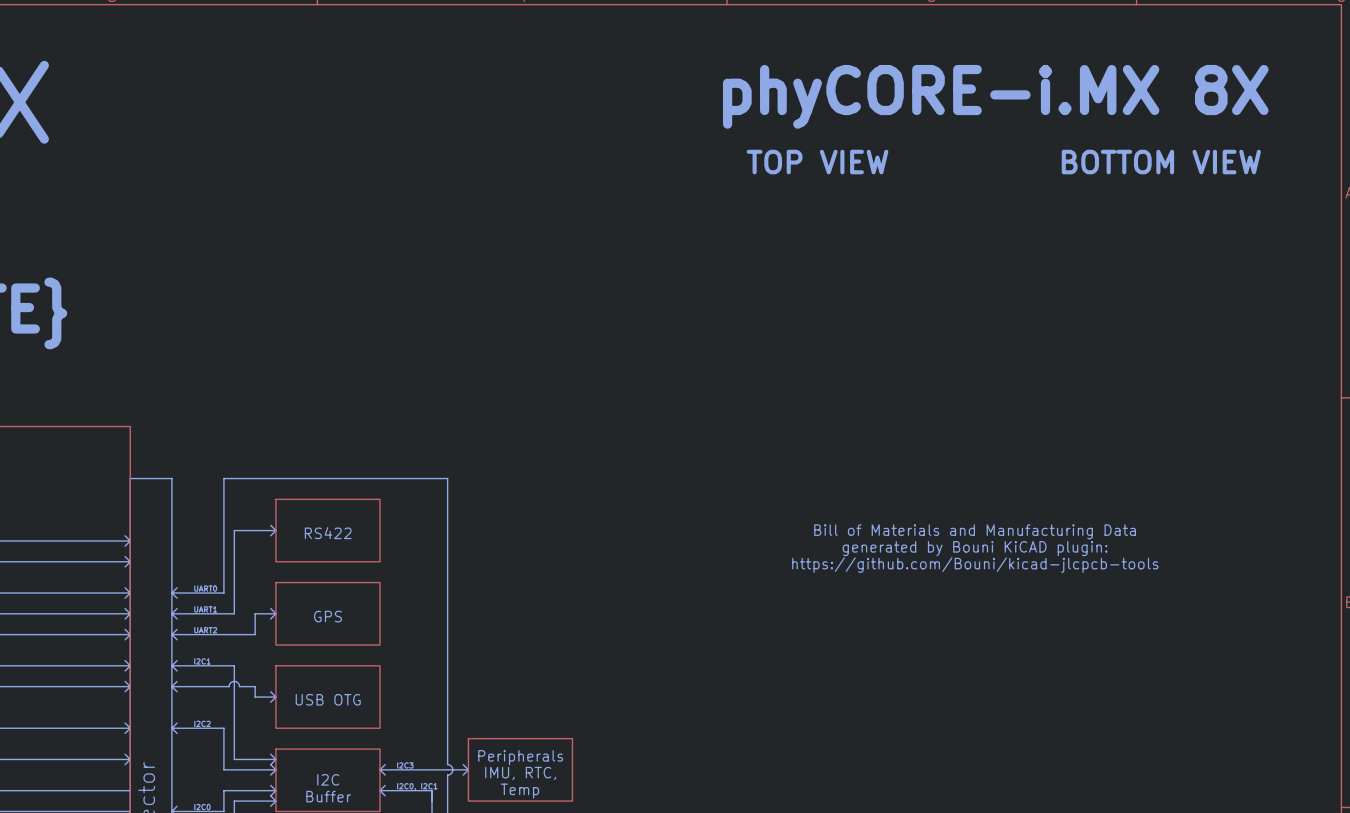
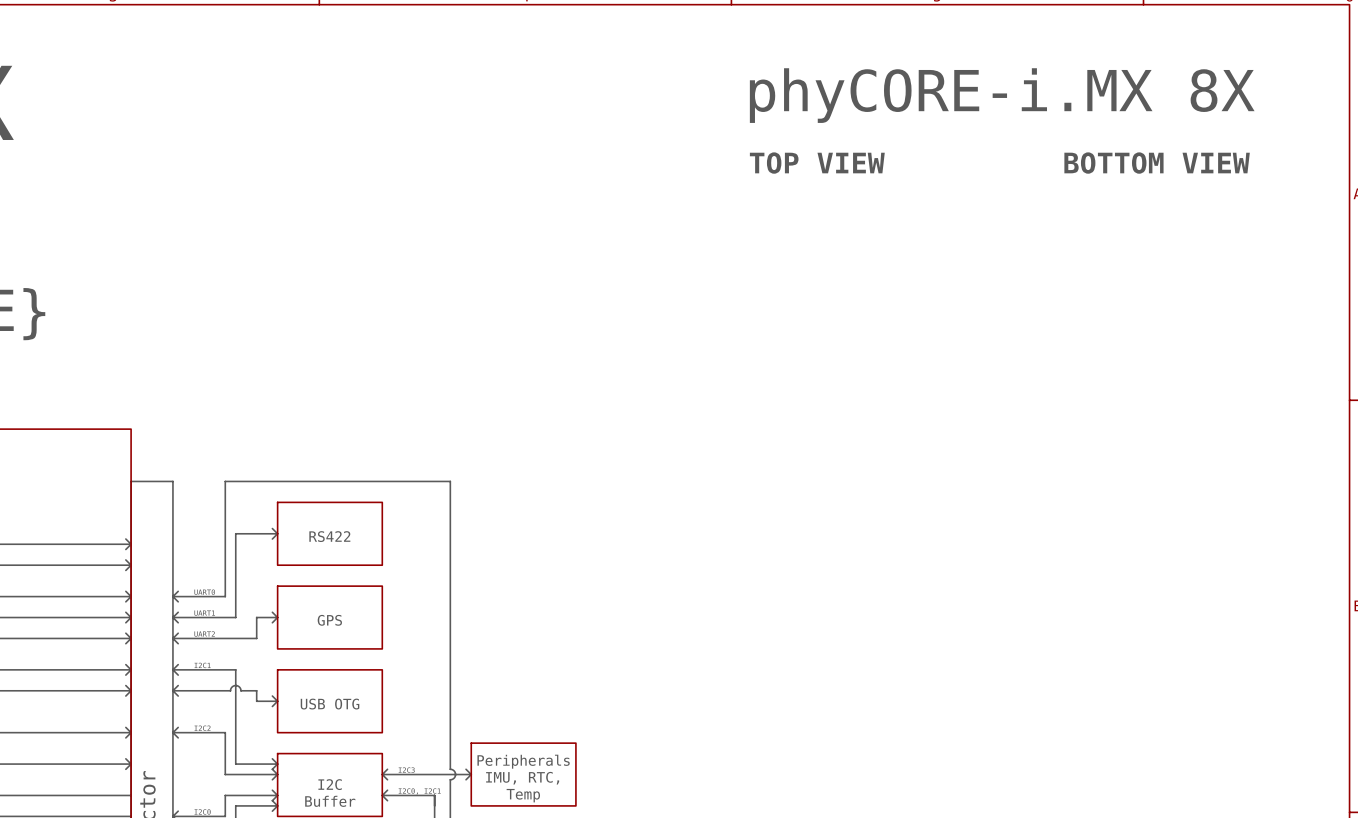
text: Bill of Materials and Manufacturing Data (975, 531) -> none
text: generated by Bouni KiCAD plugin: (975, 548) -> none
text: https://github.com/Bouni/kicad-jlcpcb-tools (975, 565) -> none

